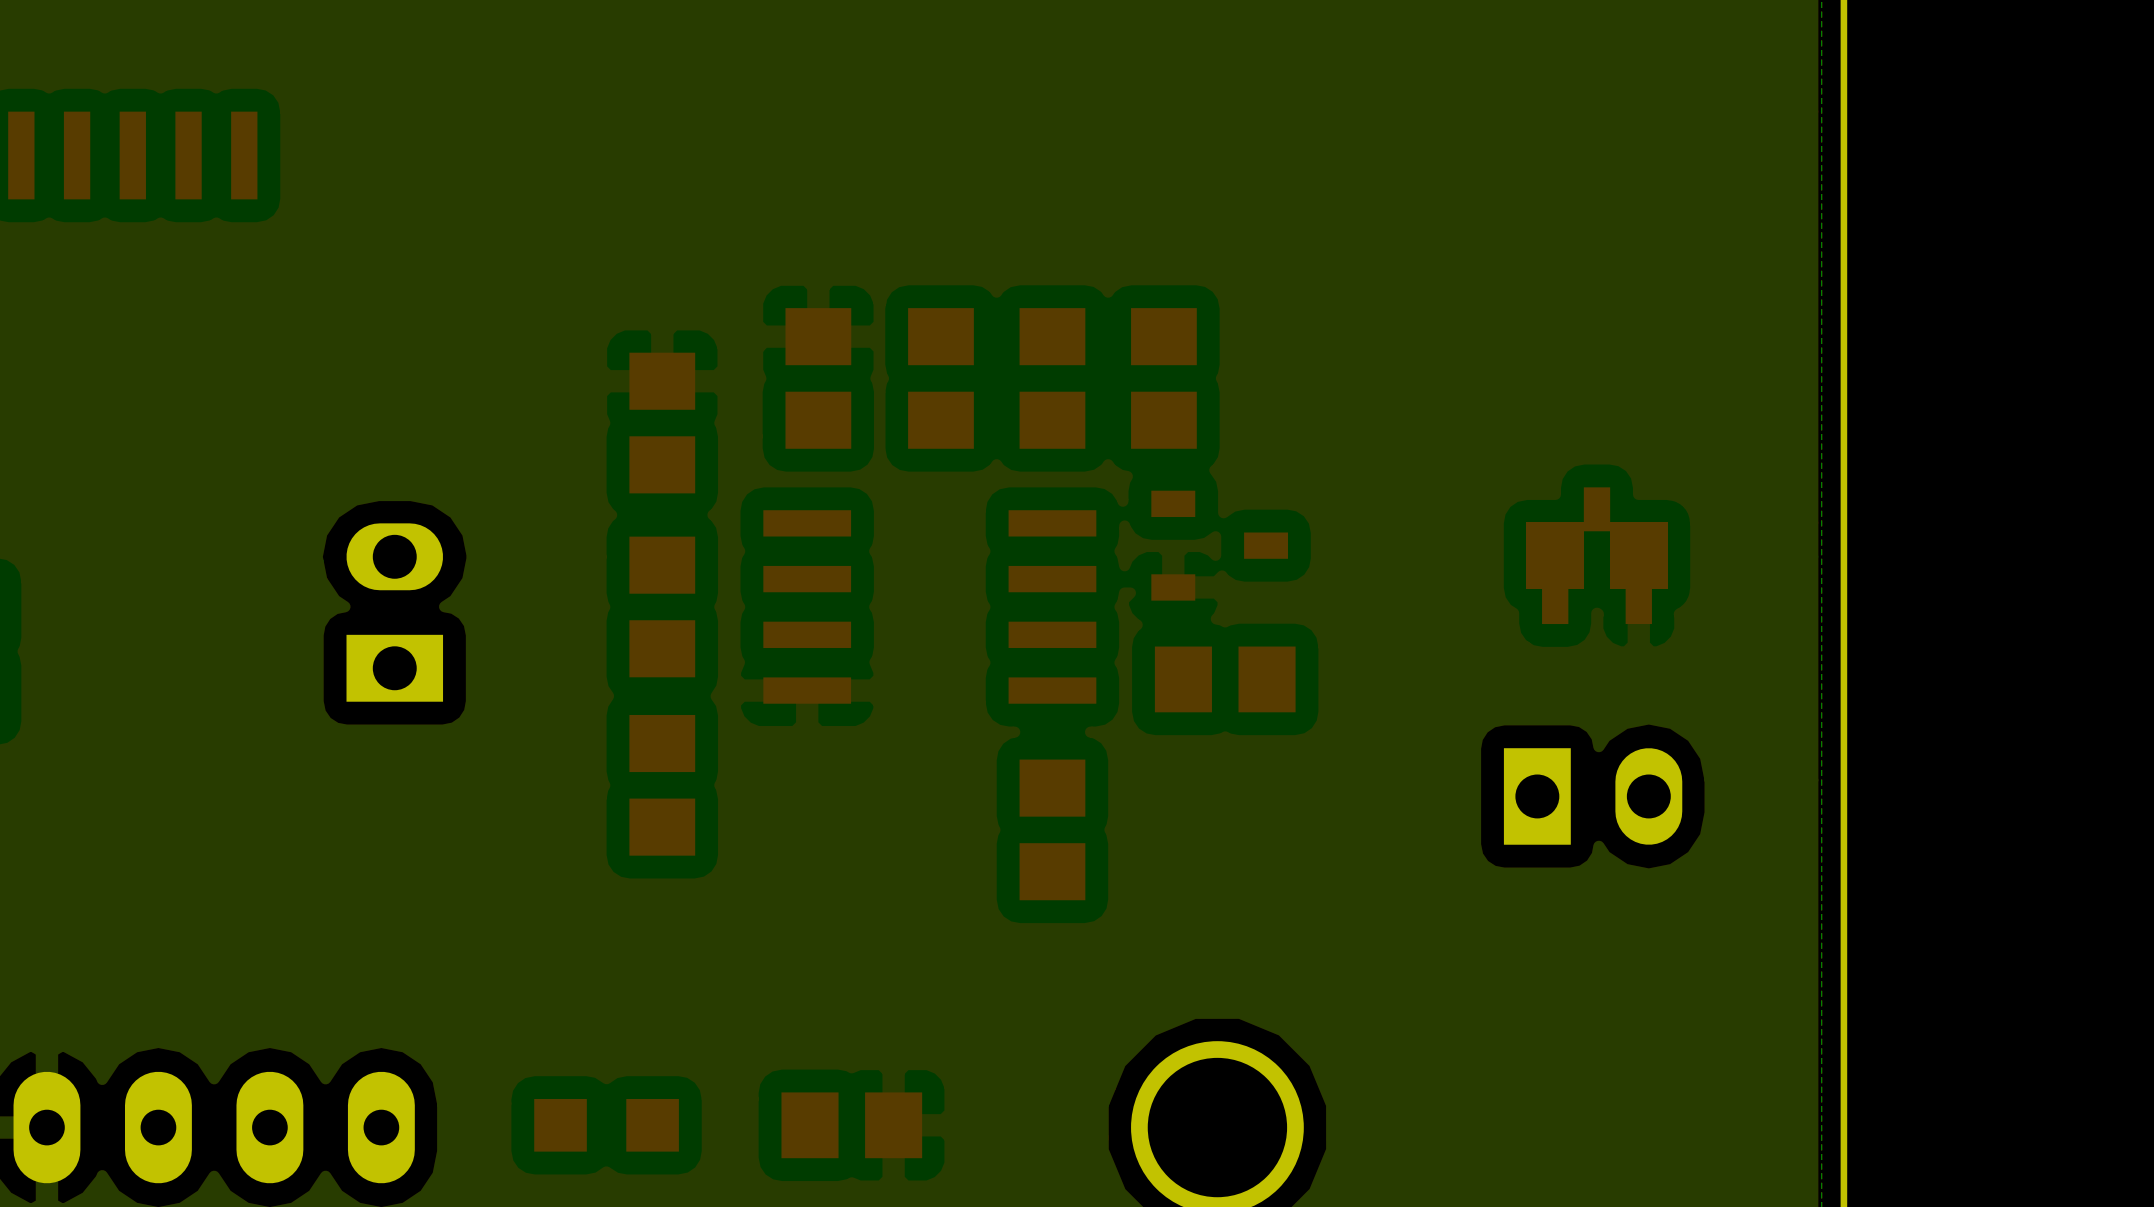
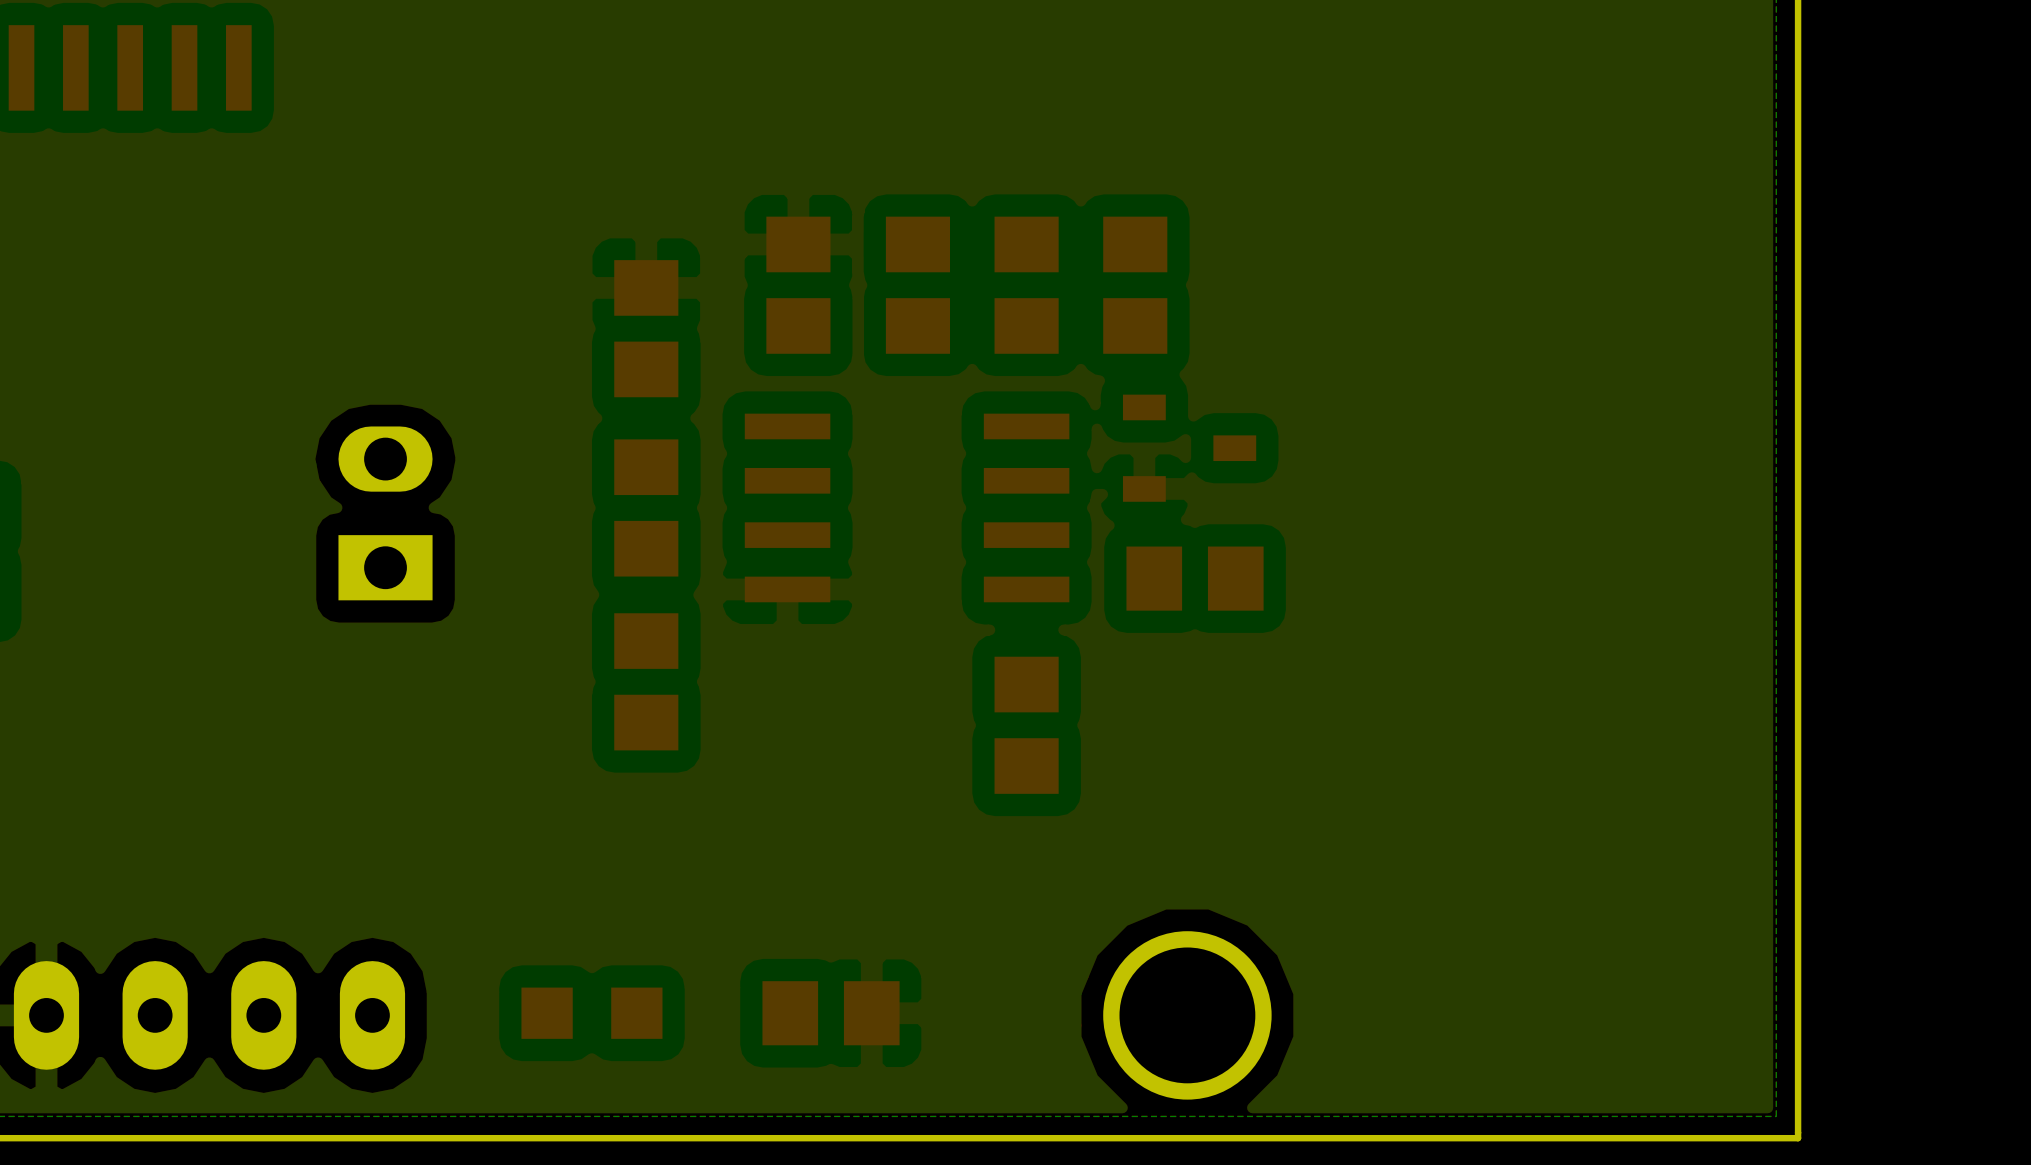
part: (1596, 555) -> none
part: (1596, 555) -> none
part: (1593, 796) -> none

